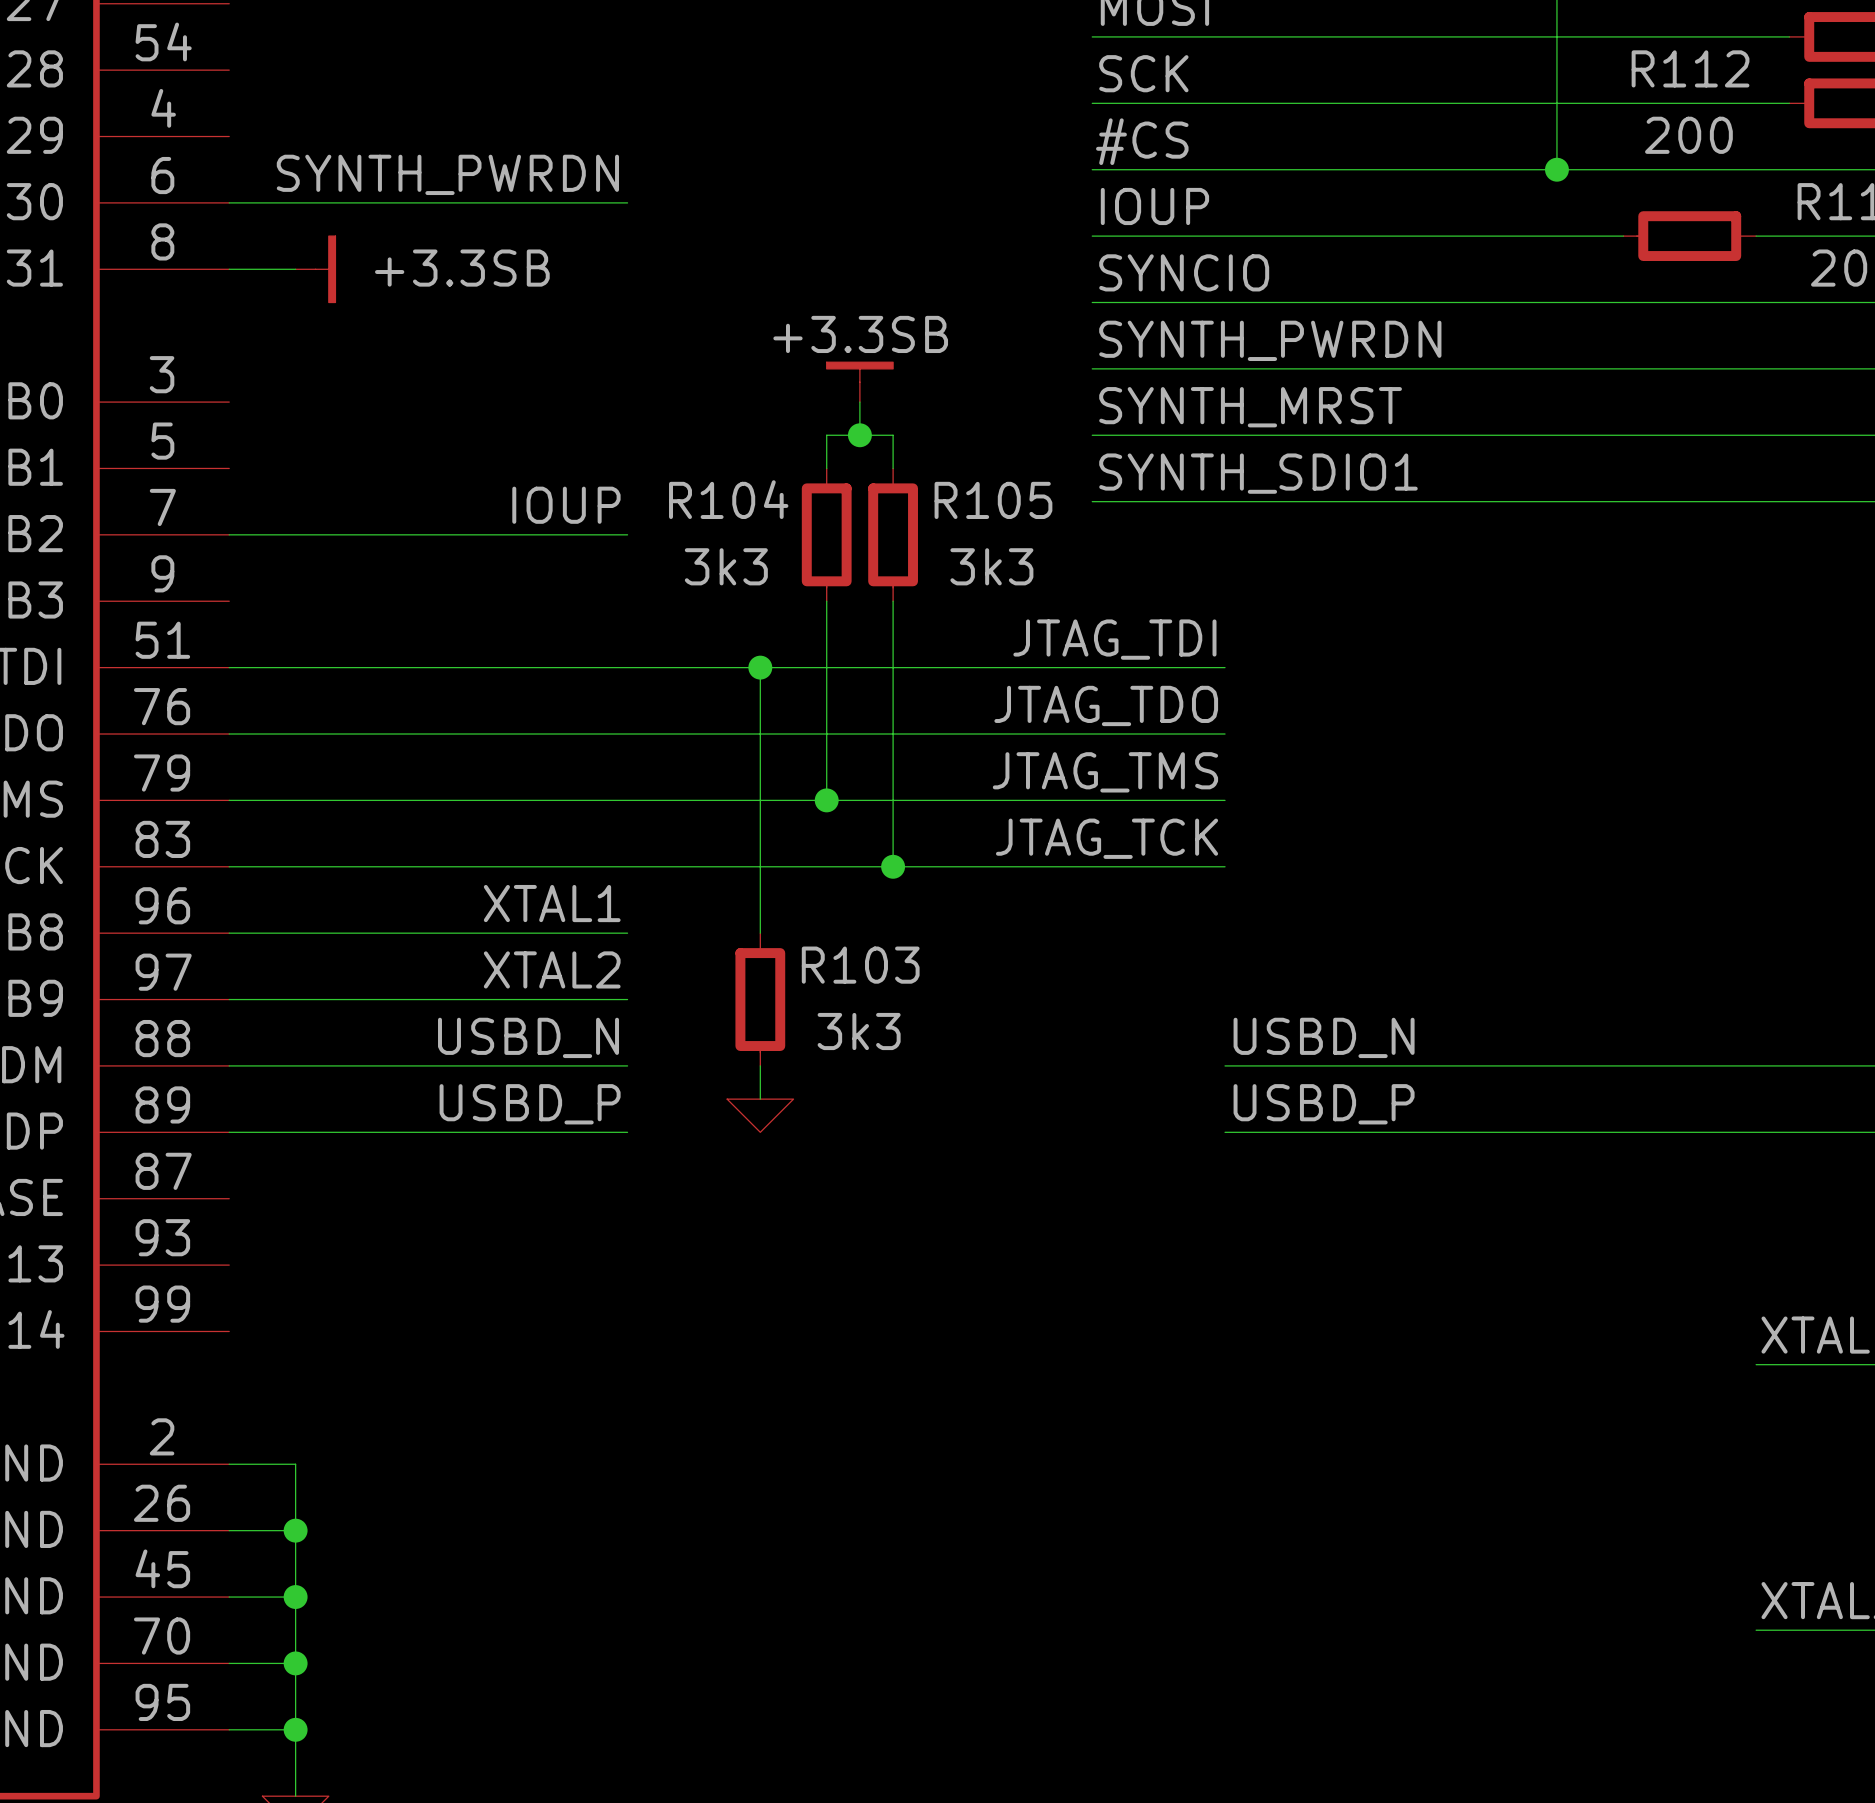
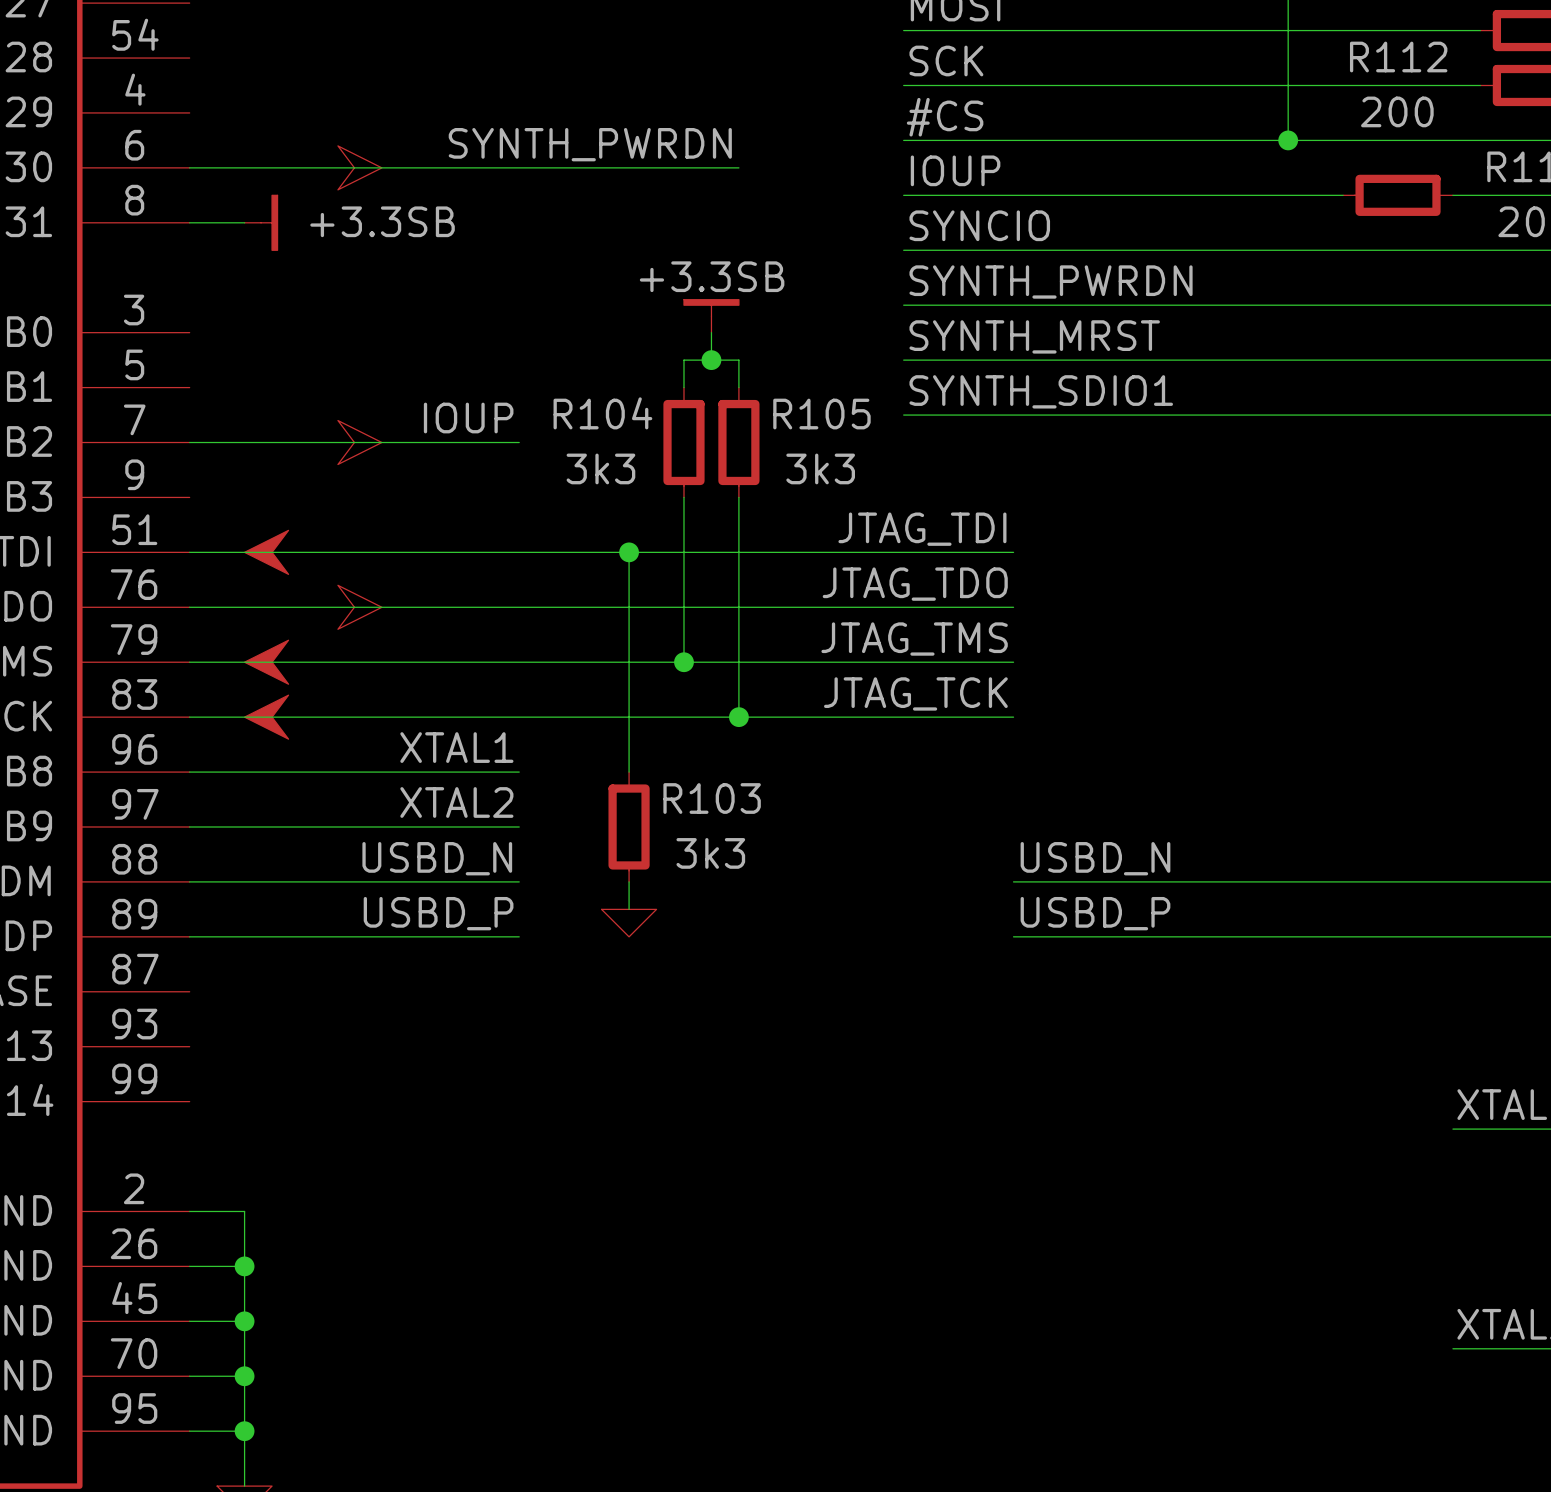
label position: SYNTH_PWRDN (447, 174) -> SYNTH_PWRDN (590, 144)
power symbol: none -> (359, 167)
wire: none -> (519, 167) (738, 167)
power symbol: none -> (359, 442)
power symbol: none -> (266, 552)
power symbol: none -> (359, 607)
power symbol: none -> (266, 662)
power symbol: none -> (266, 717)

